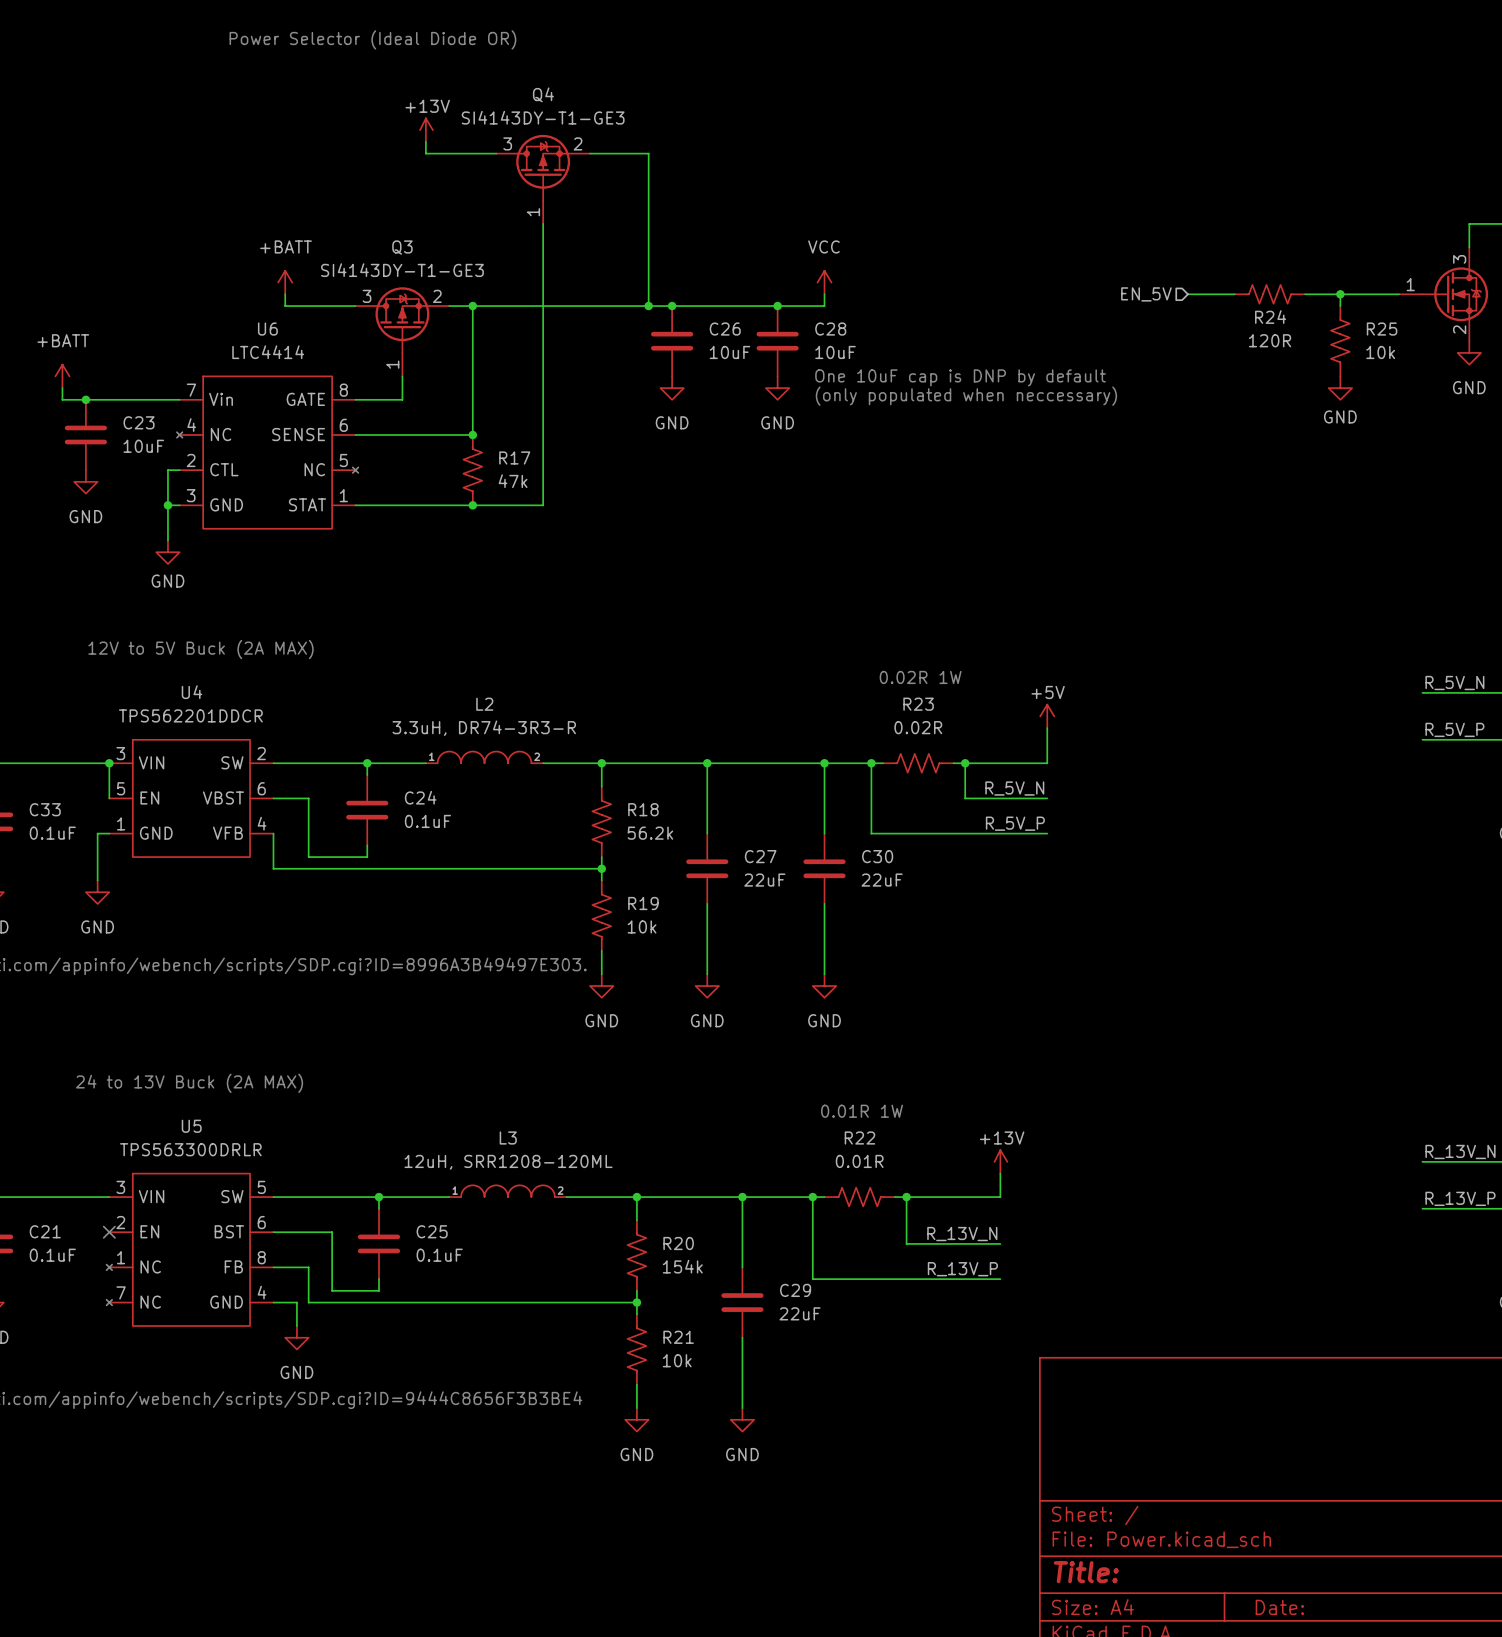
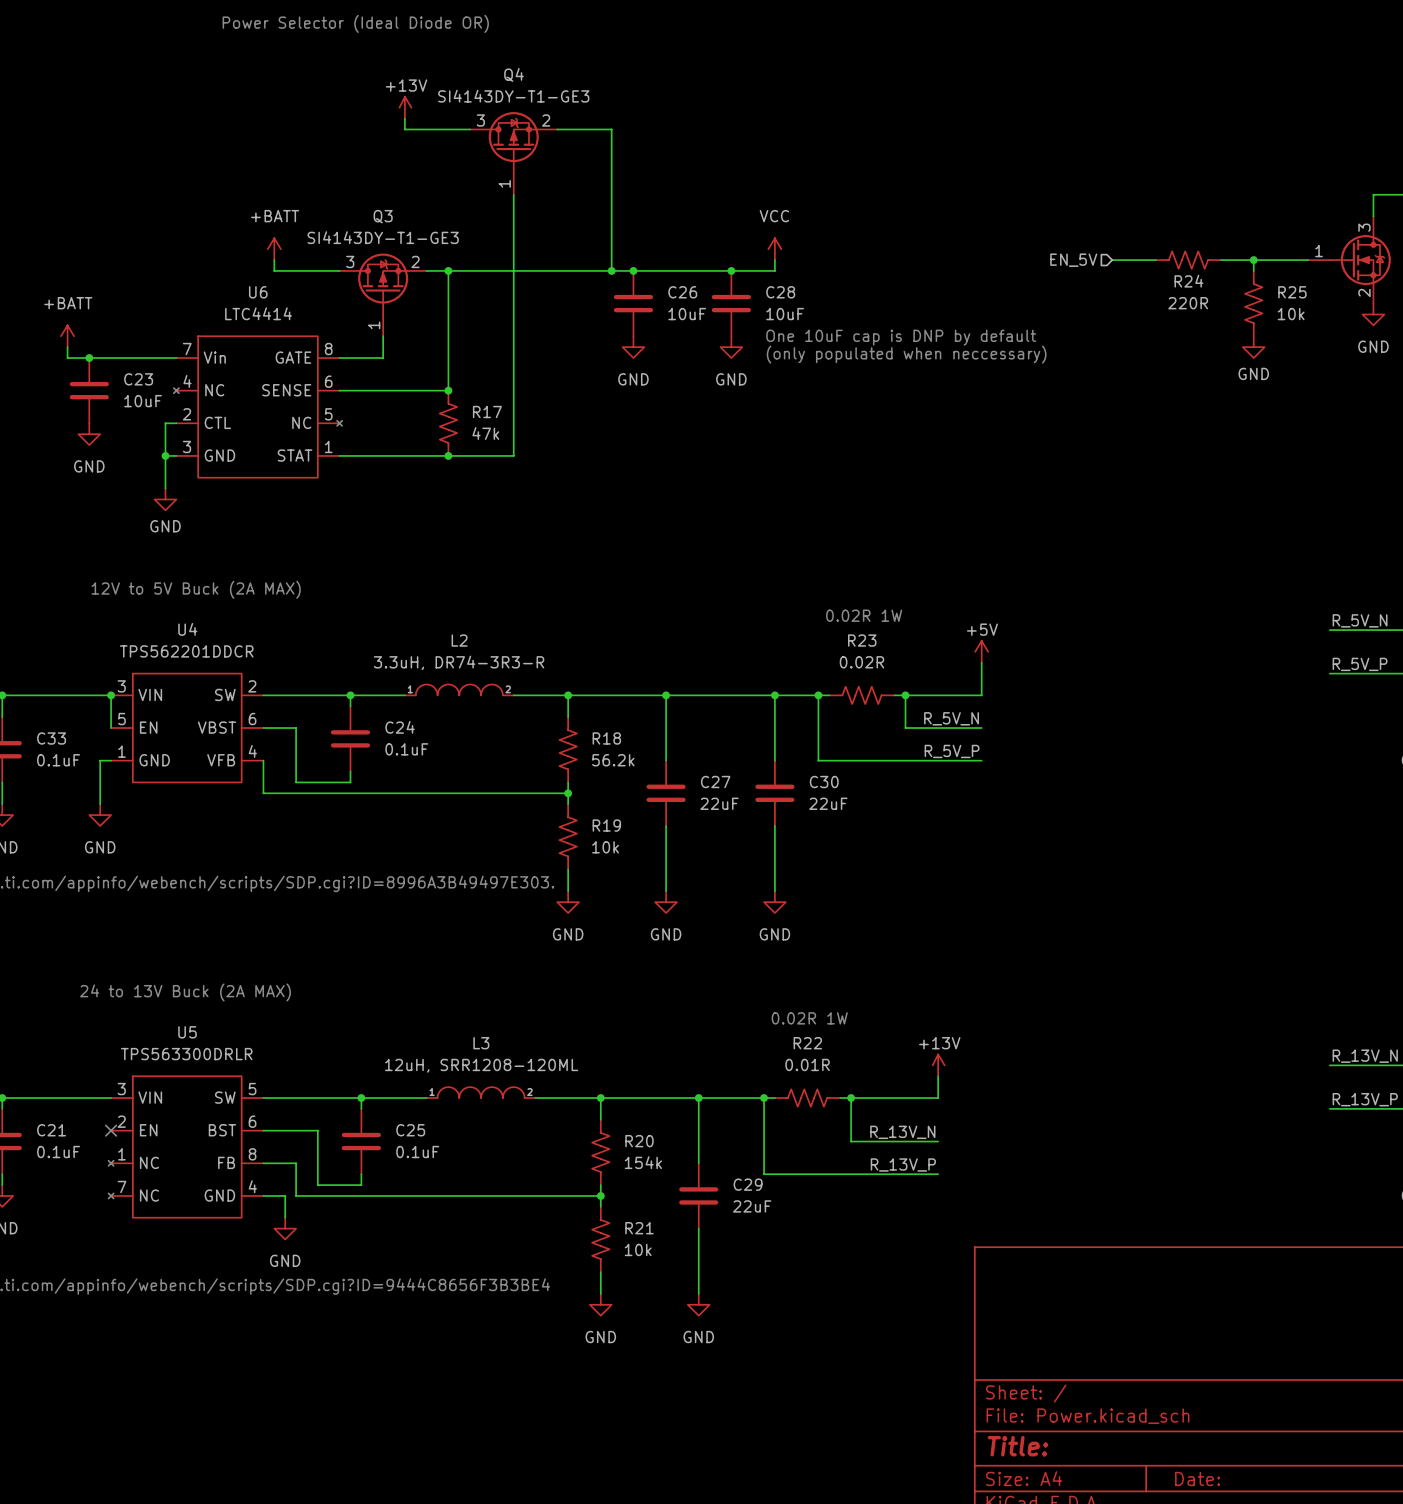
R24 value: 120R (1270, 340) -> 220R (1188, 303)
text: 0.01R 1W (862, 1111) -> 0.02R 1W (809, 1018)

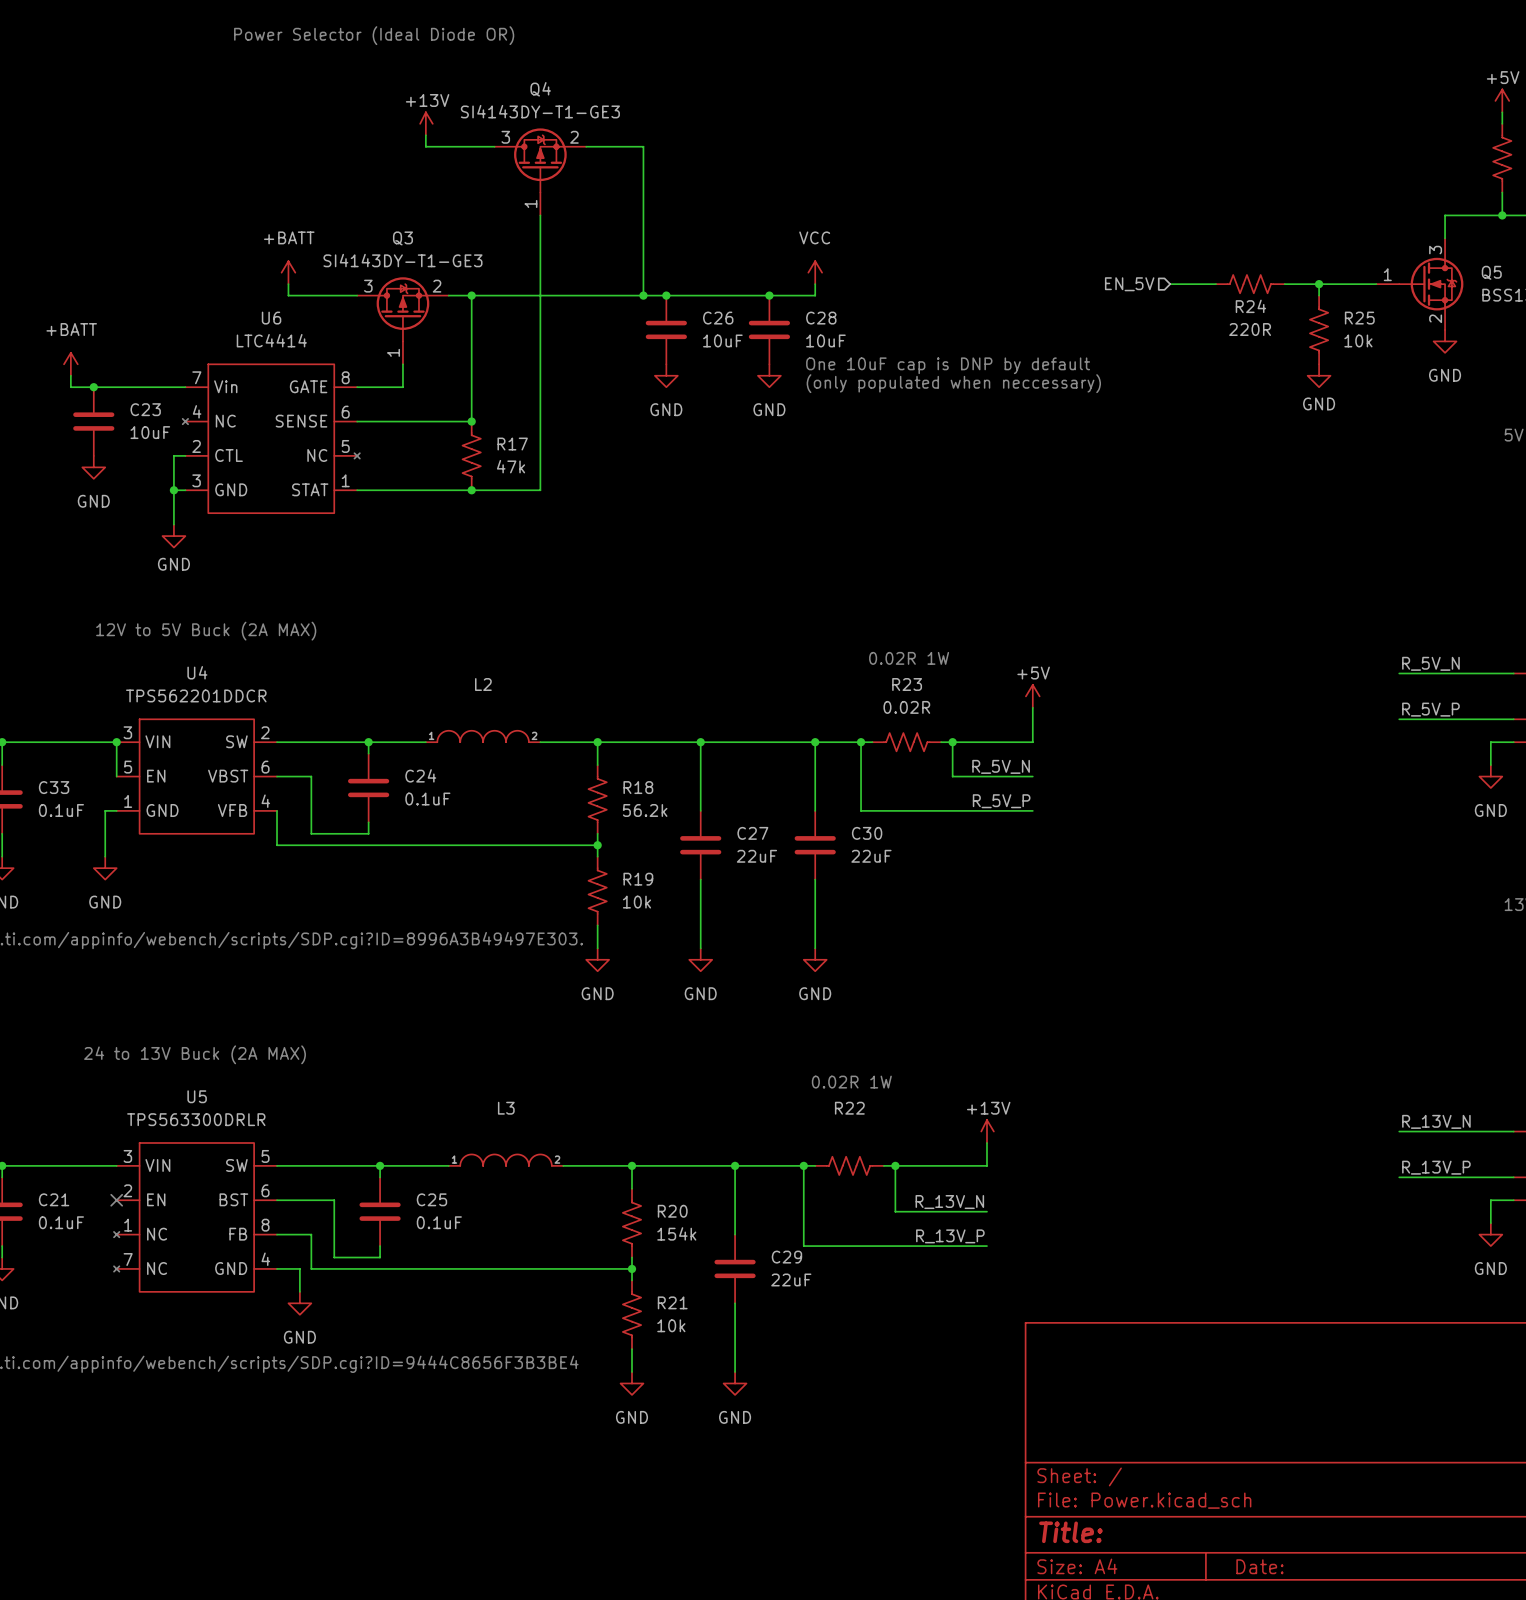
L2 value: 3.3uH, DR74-3R3-R (459, 662) -> none
R22 value: 0.01R (807, 1064) -> none
L3 value: 12uH, SRR1208-120ML (481, 1065) -> none

